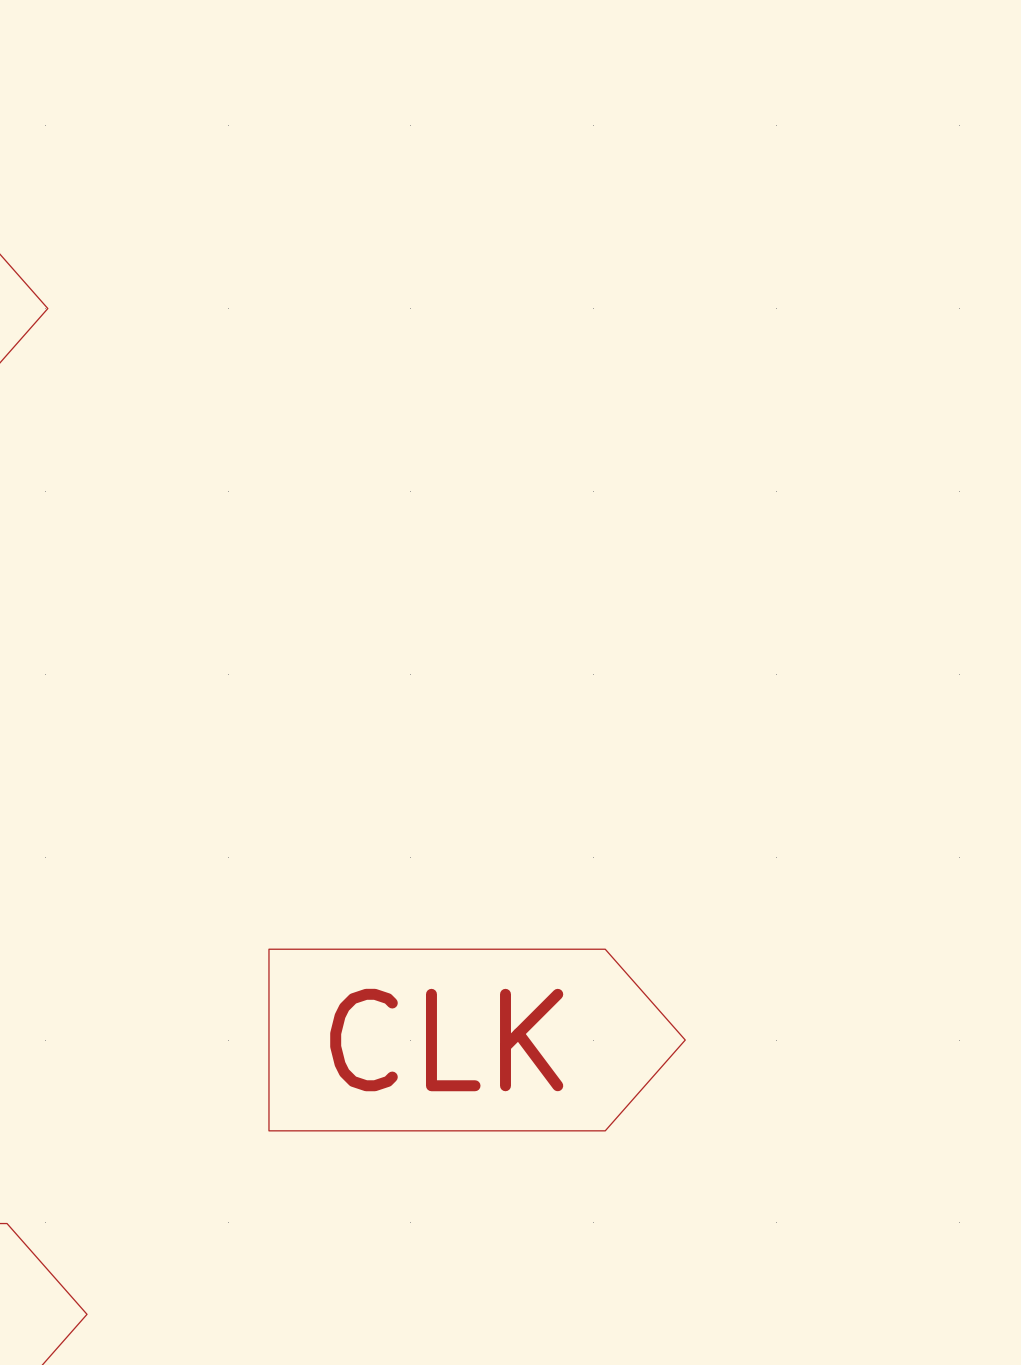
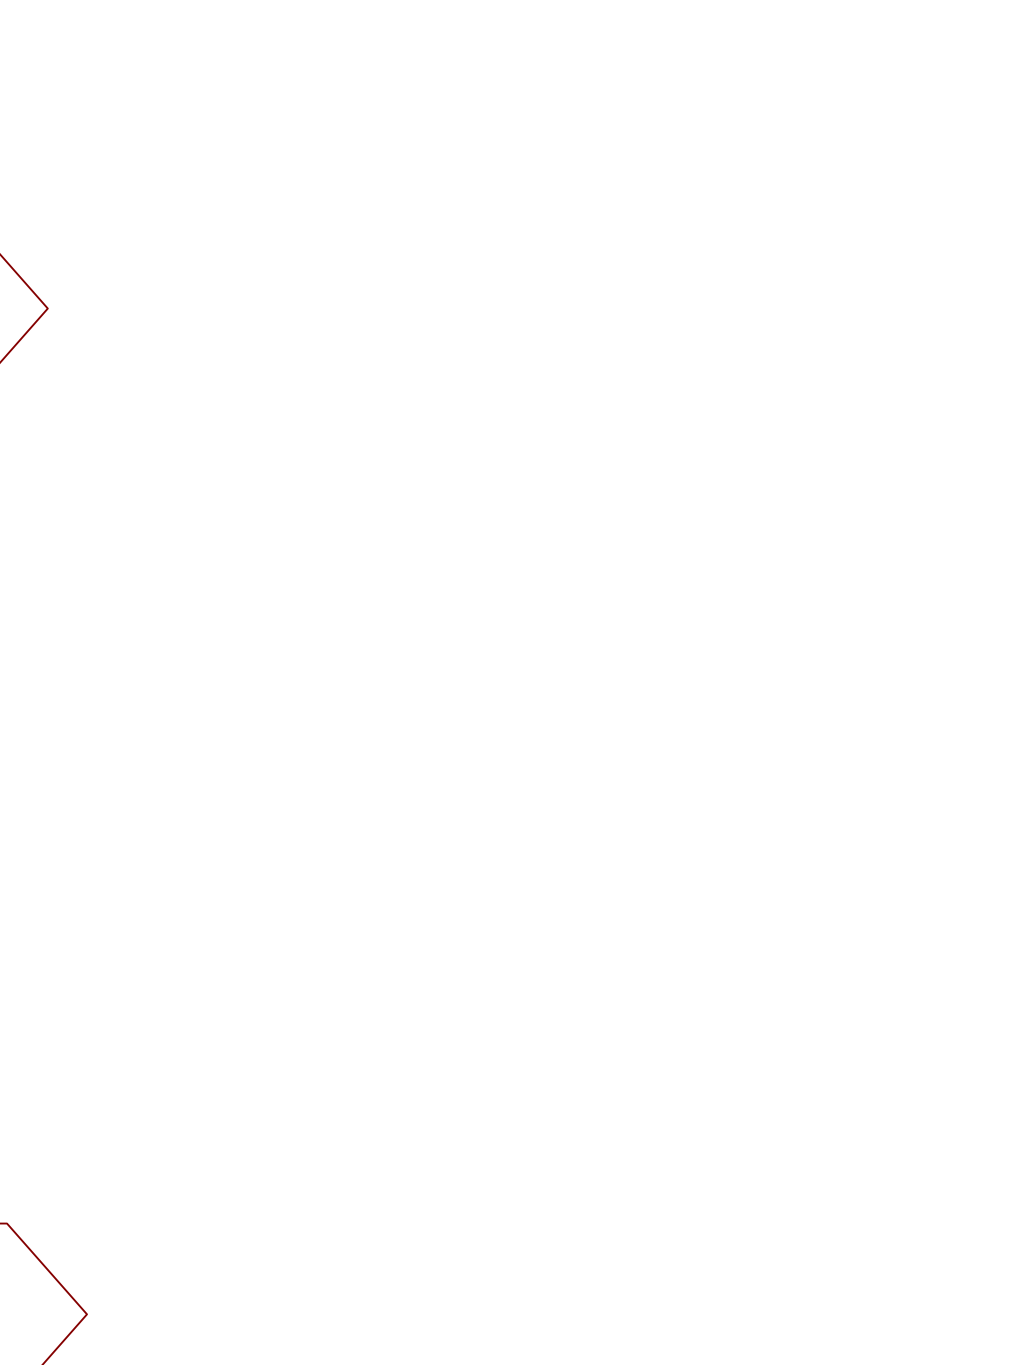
global label: CLK (446, 1040) -> none

